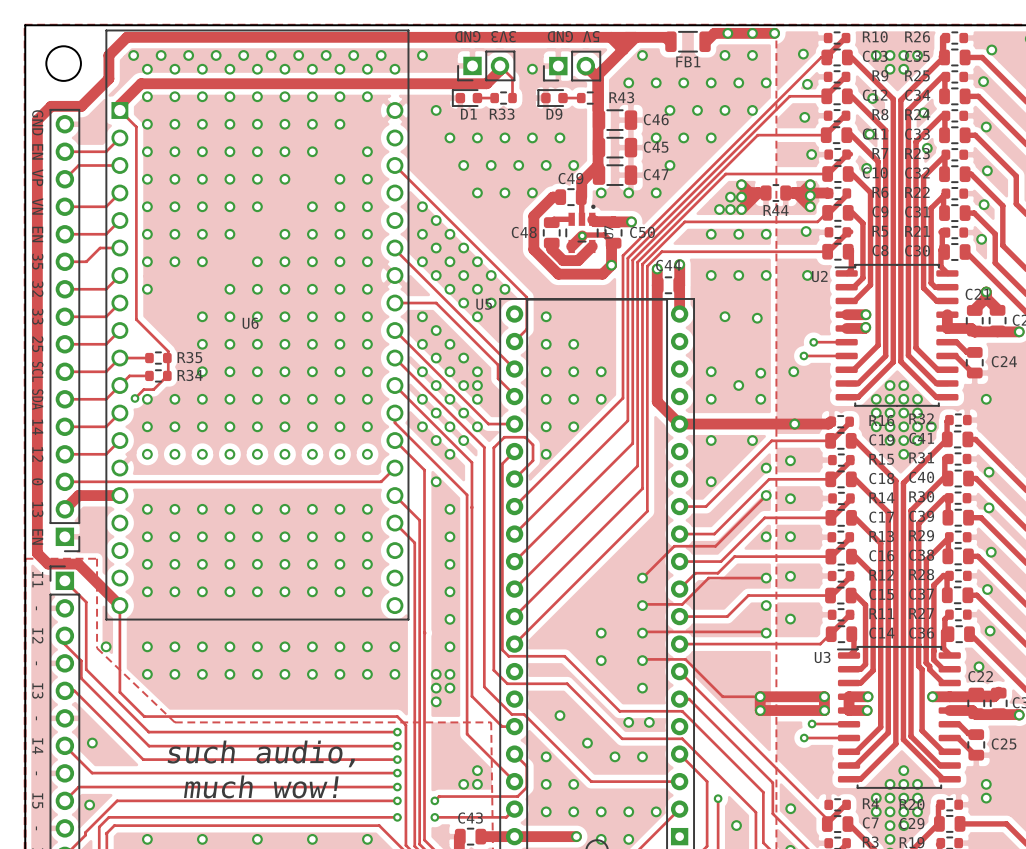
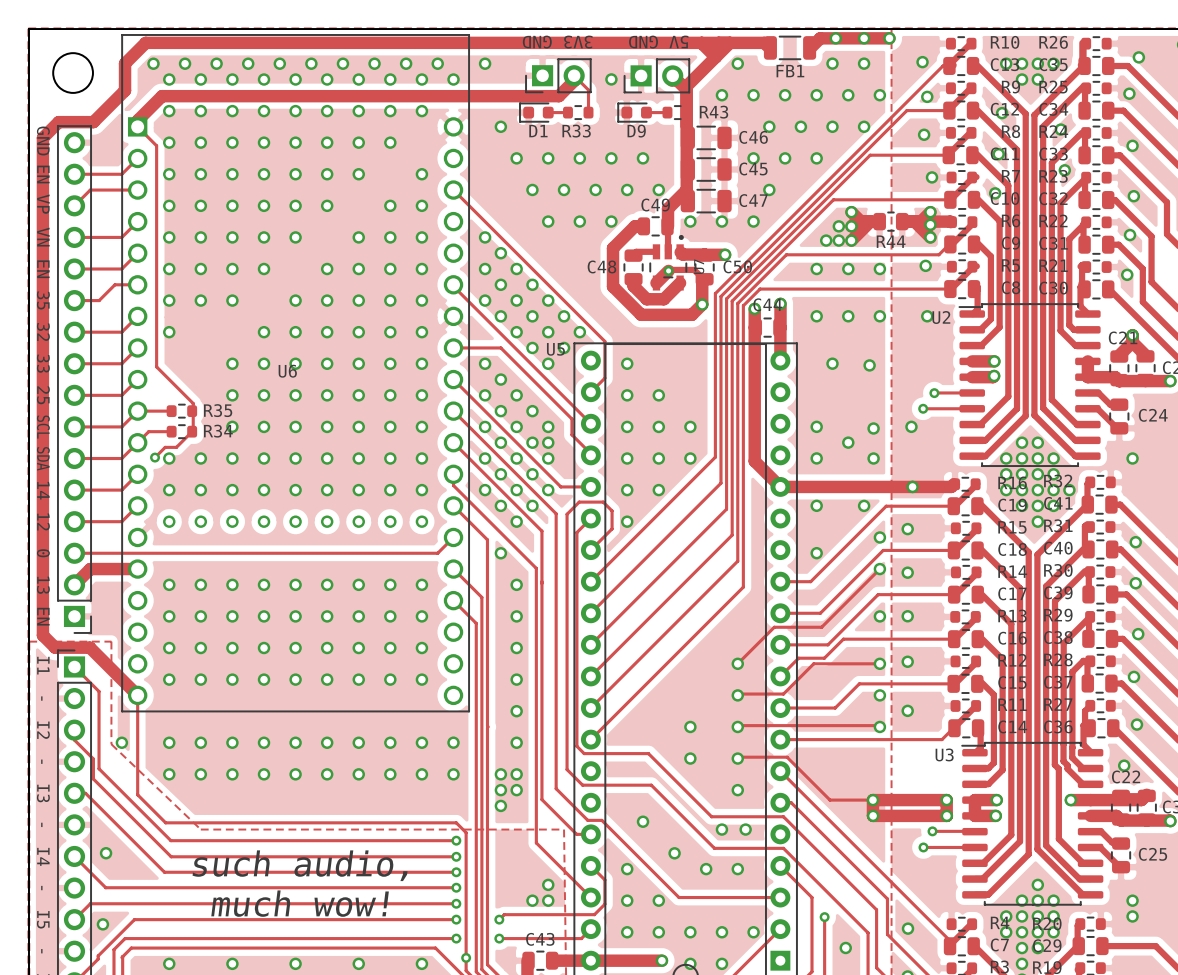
via: none -> (466, 957)

